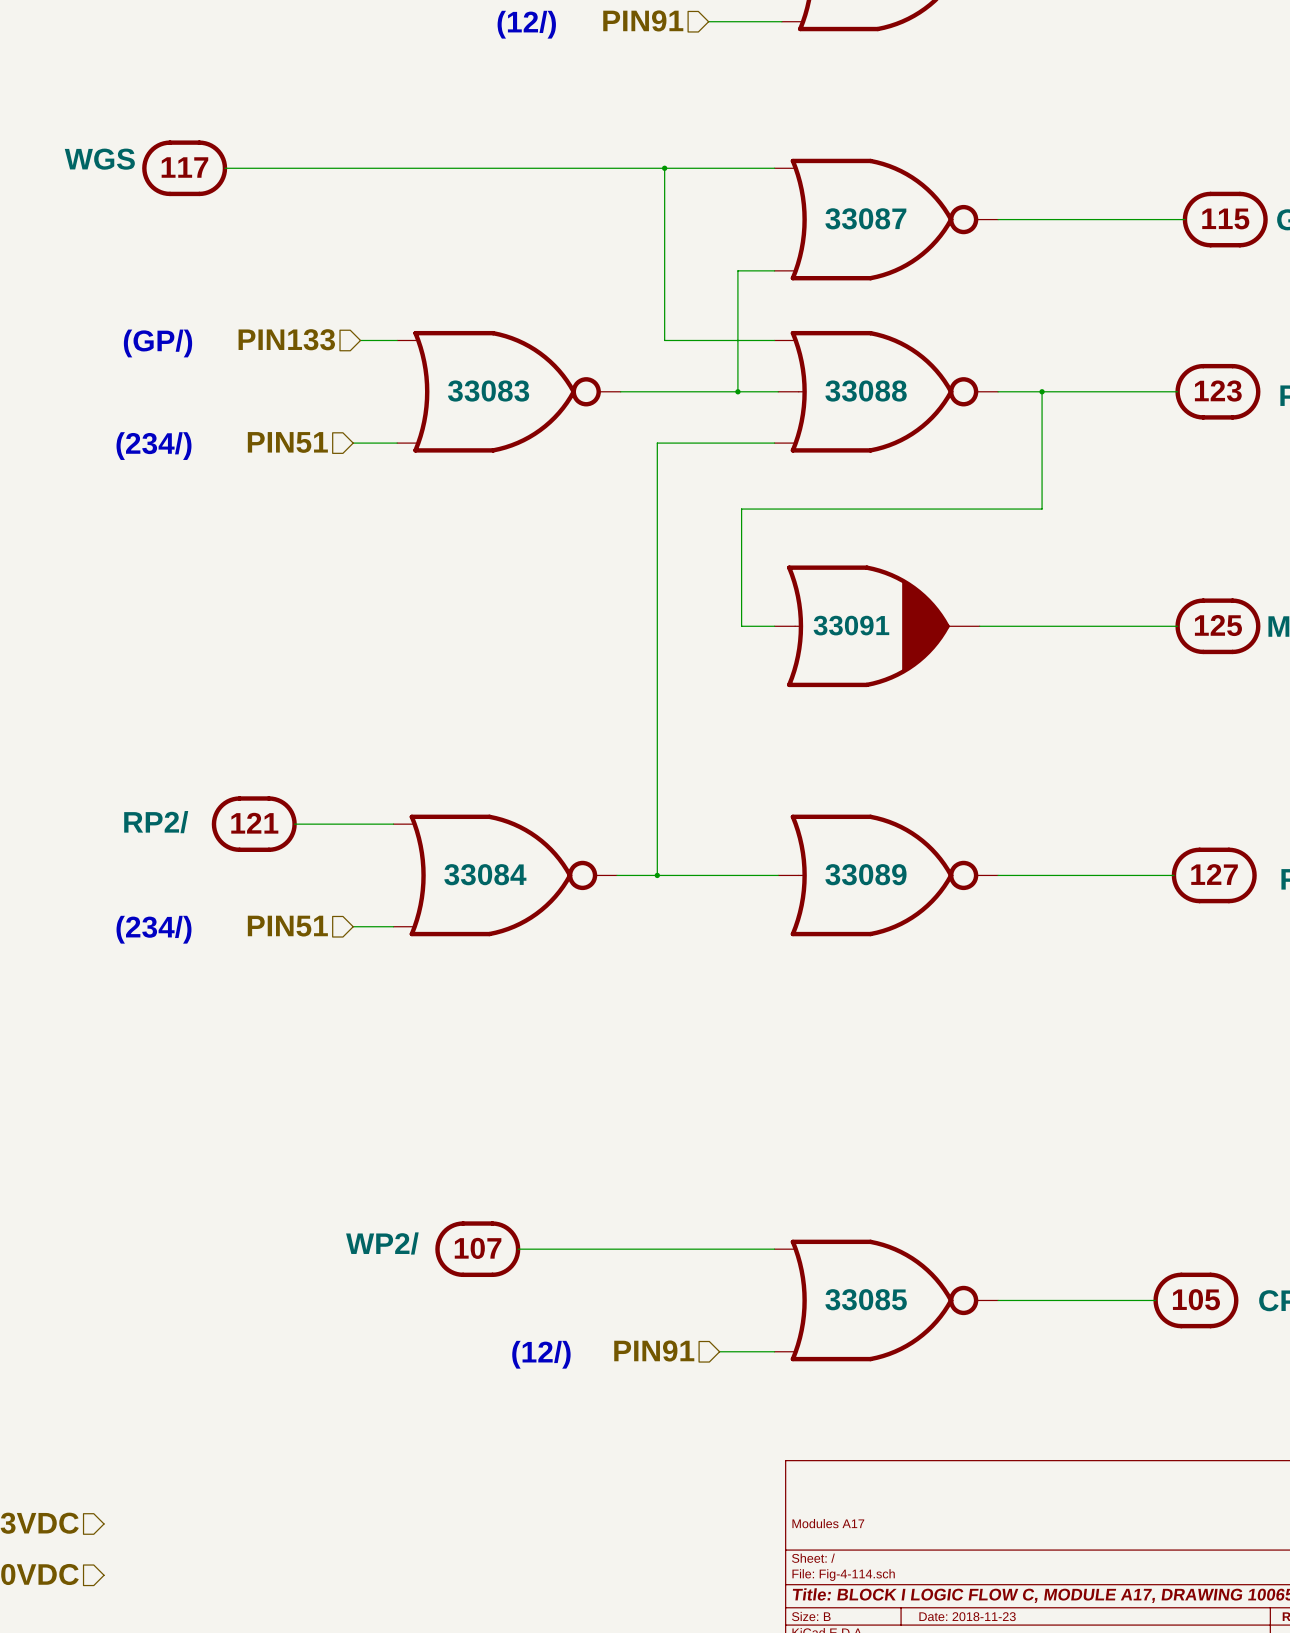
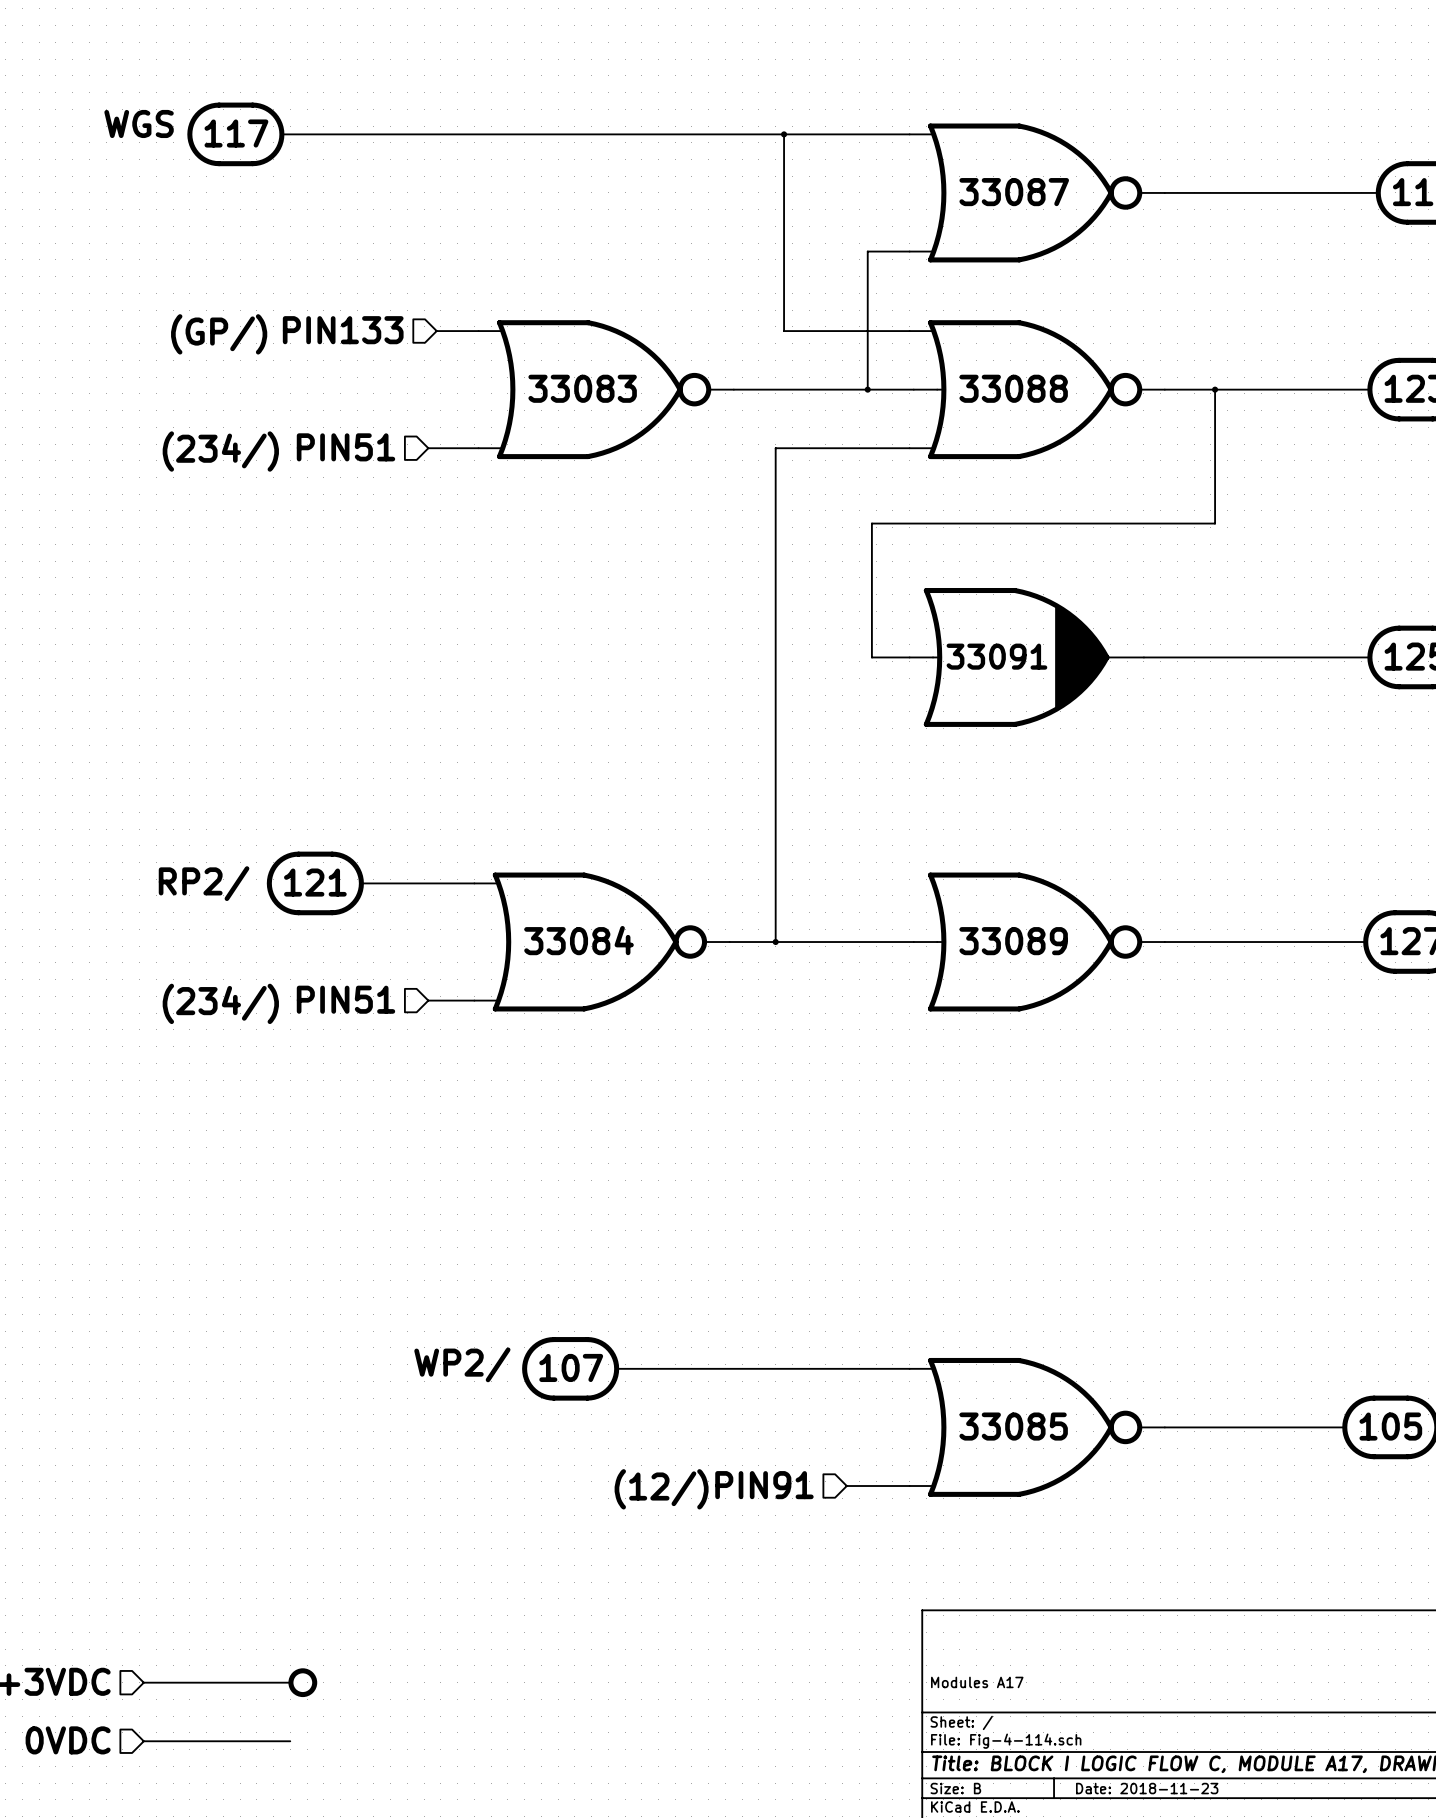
wire: none -> (143, 1682) (290, 1682)
part: none -> (302, 1682)
wire: none -> (143, 1741) (290, 1741)

